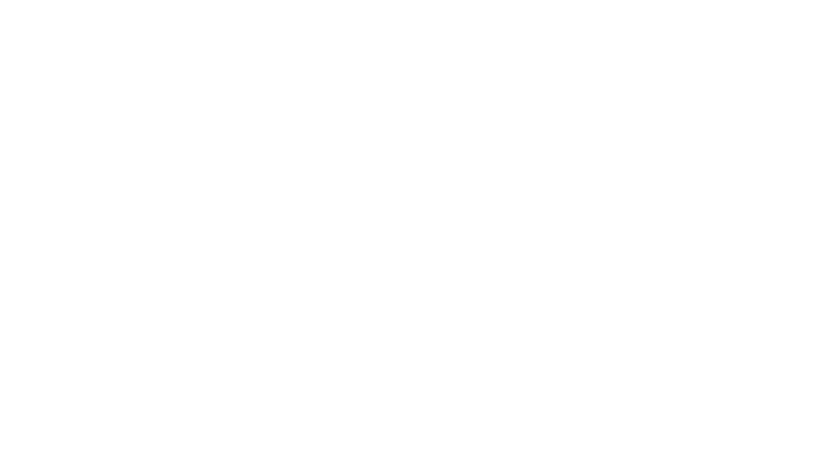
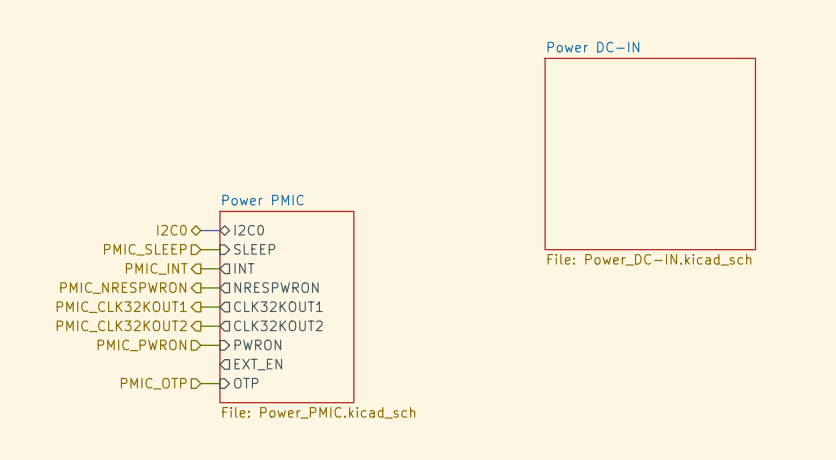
sheet Power DC-IN: none -> File: Power_DC-IN.kicad_sch (650, 154)
hierarchical label: none -> I2C0 (171, 230)
bus: none -> (200, 230) (219, 230)
sheet pin: none -> I2C0 (249, 230)
hierarchical label: none -> PMIC_SLEEP (145, 249)
wire: none -> (200, 249) (219, 249)
sheet pin: none -> SLEEP (254, 249)
hierarchical label: none -> PMIC_INT (156, 268)
wire: none -> (200, 268) (219, 268)
sheet pin: none -> INT (244, 268)
wire: none -> (200, 287) (219, 287)
sheet pin: none -> NRESPWRON (276, 287)
hierarchical label: none -> PMIC_NRESPWRON (123, 288)
sheet pin: none -> CLK32KOUT1 (278, 306)
hierarchical label: none -> PMIC_CLK32KOUT1 (121, 307)
wire: none -> (200, 307) (219, 307)
sheet Power PMIC: none -> File: Power_PMIC.kicad_sch (286, 307)
sheet pin: none -> CLK32KOUT2 (278, 325)
hierarchical label: none -> PMIC_CLK32KOUT2 (121, 326)
wire: none -> (200, 326) (219, 326)
sheet pin: none -> PWRON (257, 344)
hierarchical label: none -> PMIC_PWRON (141, 345)
wire: none -> (200, 345) (219, 345)
sheet pin: none -> EXT_EN (258, 364)
hierarchical label: none -> PMIC_OTP (153, 383)
wire: none -> (200, 383) (219, 383)
sheet pin: none -> OTP (246, 383)

